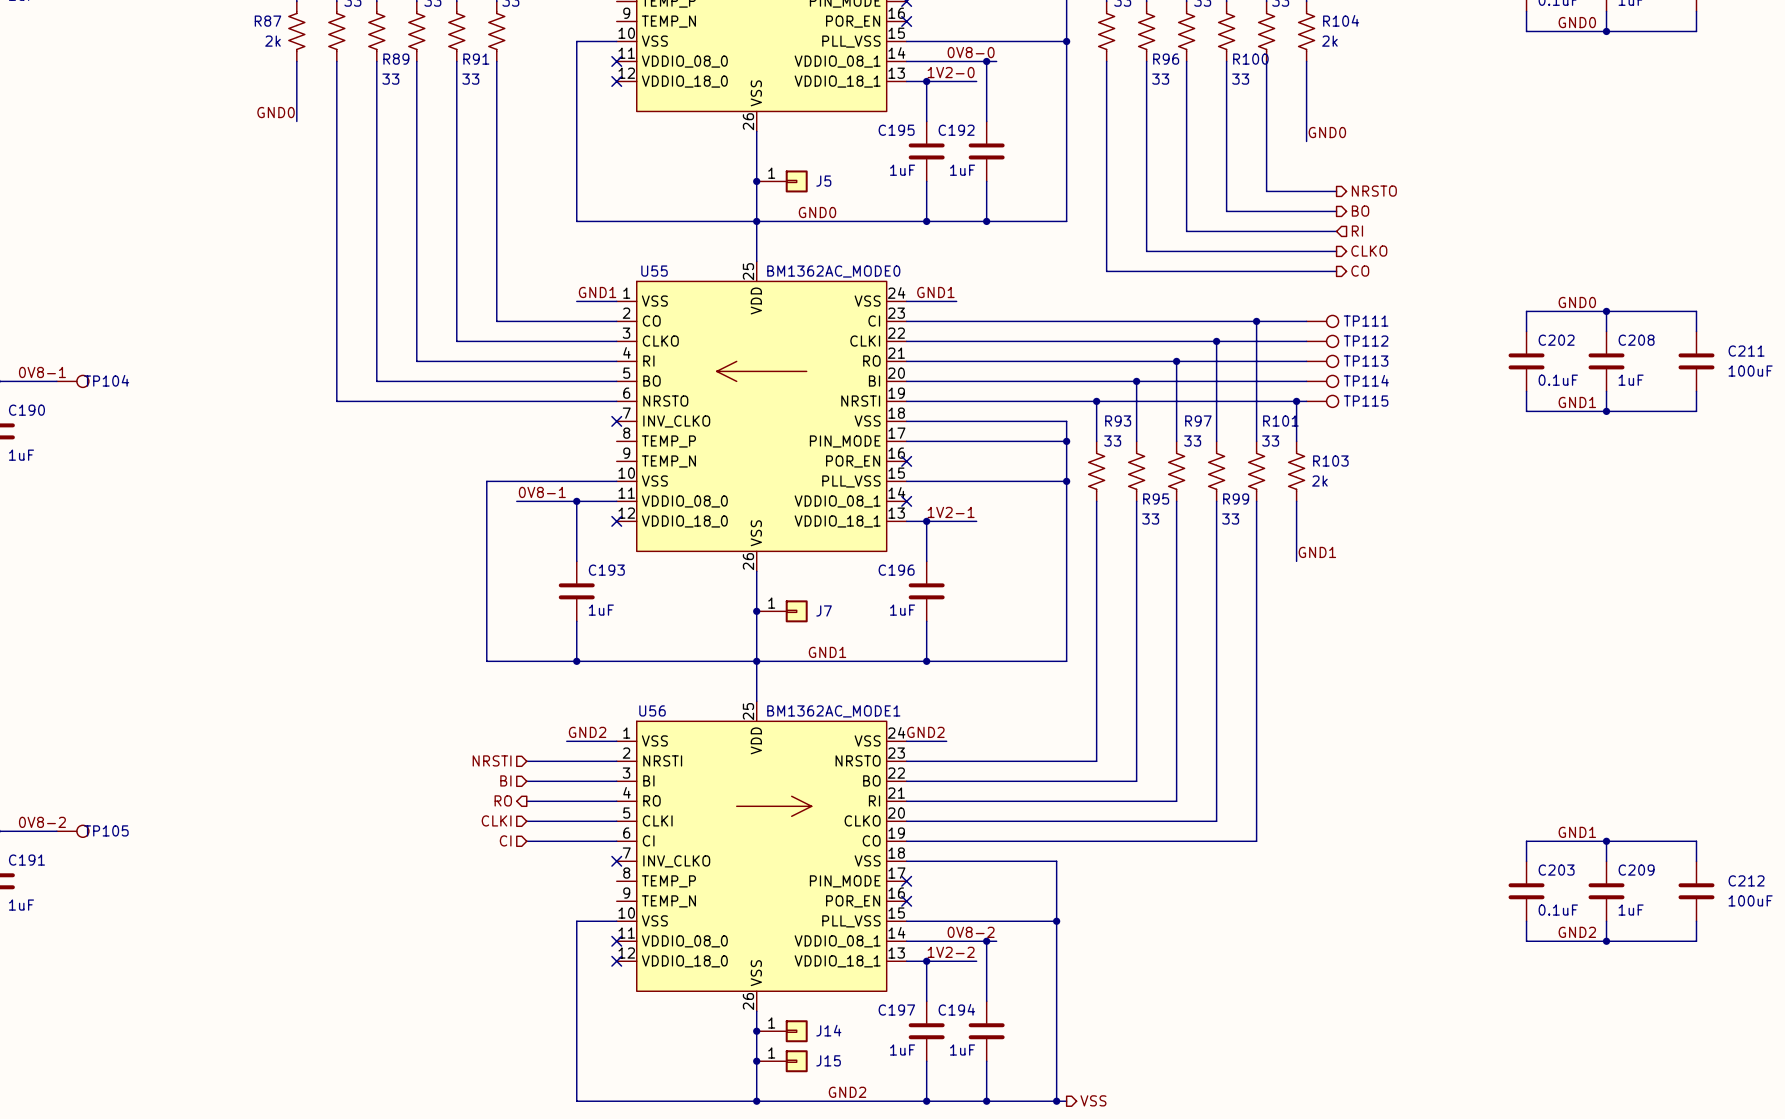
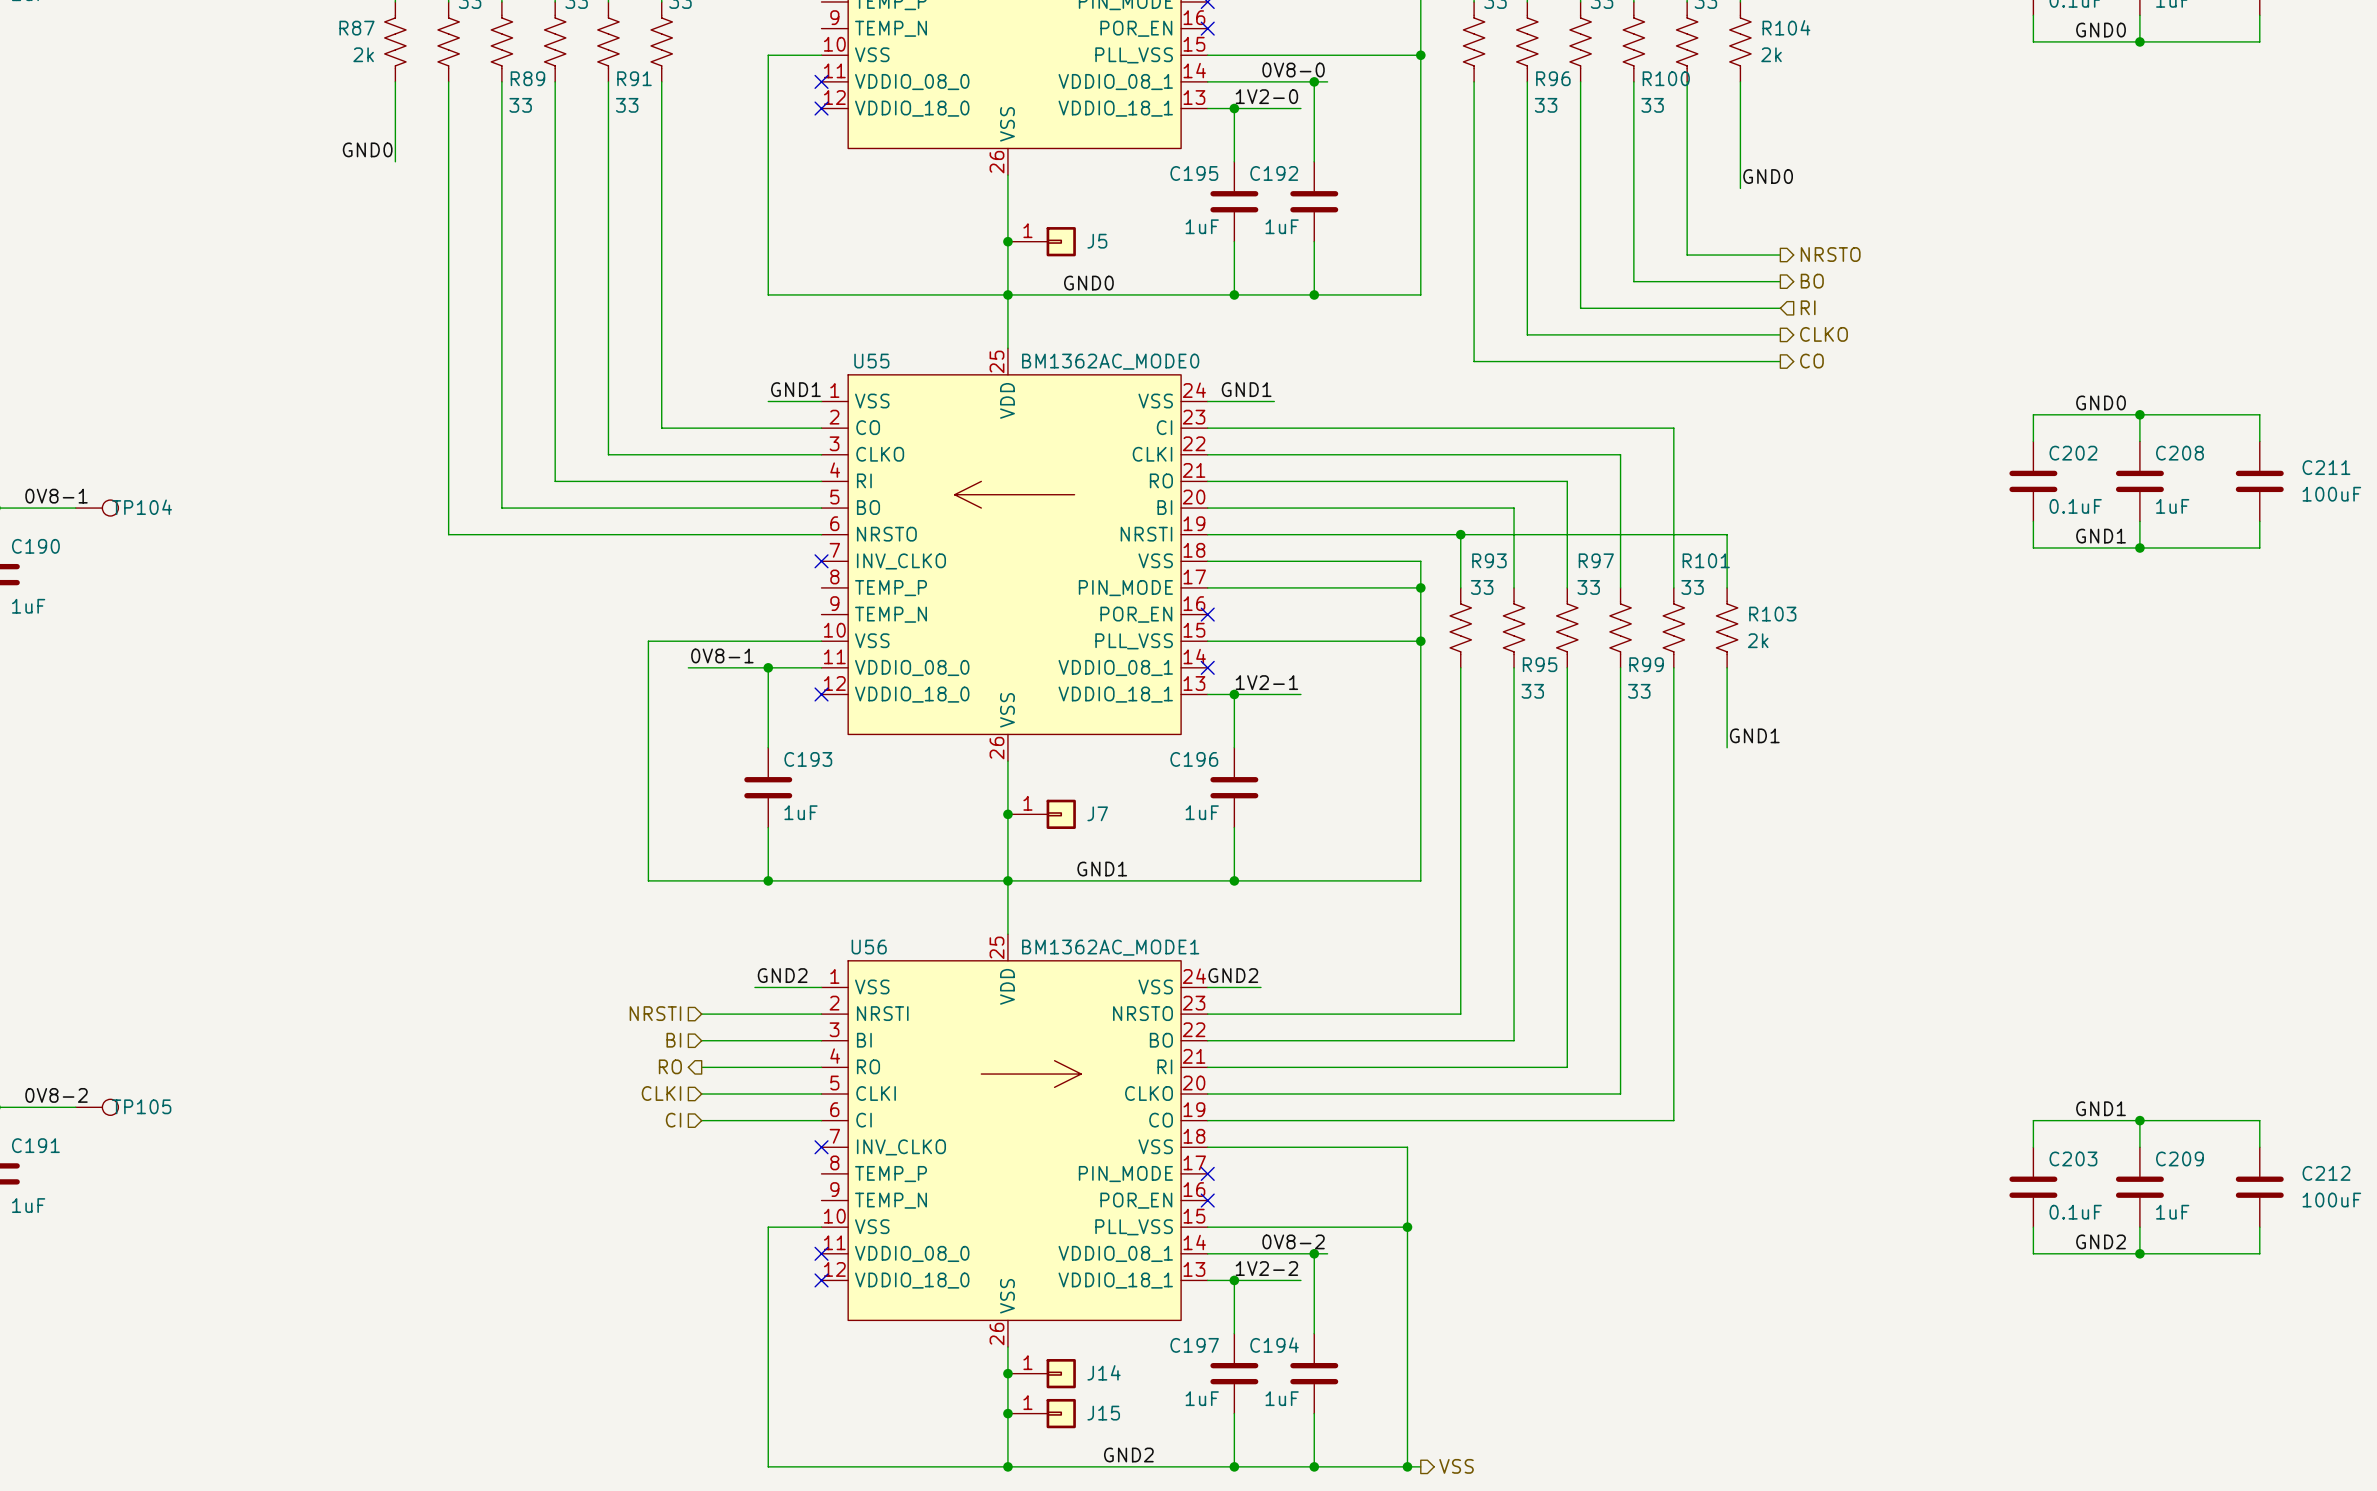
wire: (1256, 321) (1306, 321) -> none
junction: (1256, 321) -> none
TP111: (1322, 321) -> none
wire: (1216, 341) (1306, 341) -> none
junction: (1216, 341) -> none
TP112: (1322, 341) -> none
wire: (1176, 361) (1306, 361) -> none
junction: (1176, 361) -> none
TP113: (1322, 361) -> none
wire: (1136, 381) (1306, 381) -> none
junction: (1136, 381) -> none
TP114: (1322, 381) -> none
wire: (1296, 401) (1306, 401) -> none
junction: (1296, 401) -> none
TP115: (1322, 401) -> none

